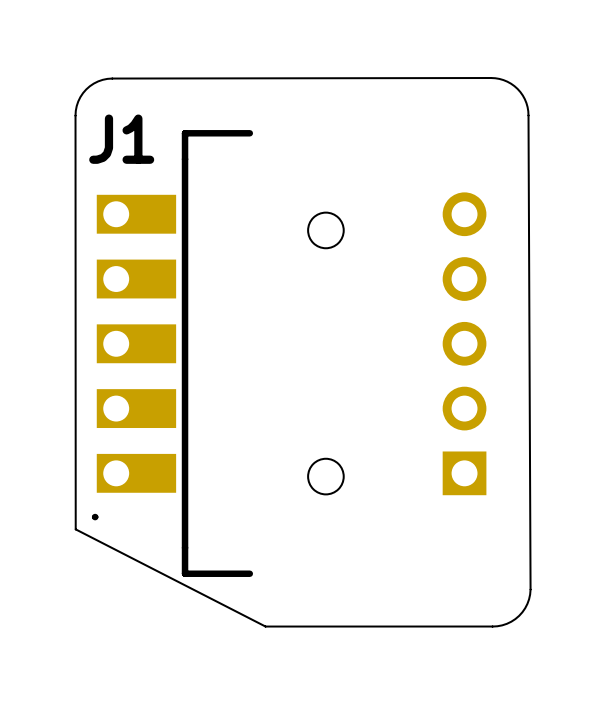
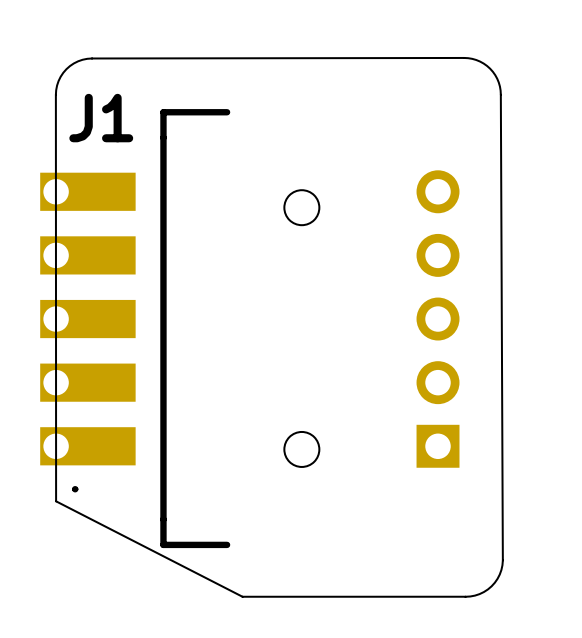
J1 footprint: [91, 130, 344, 577] -> [40, 109, 320, 549]

